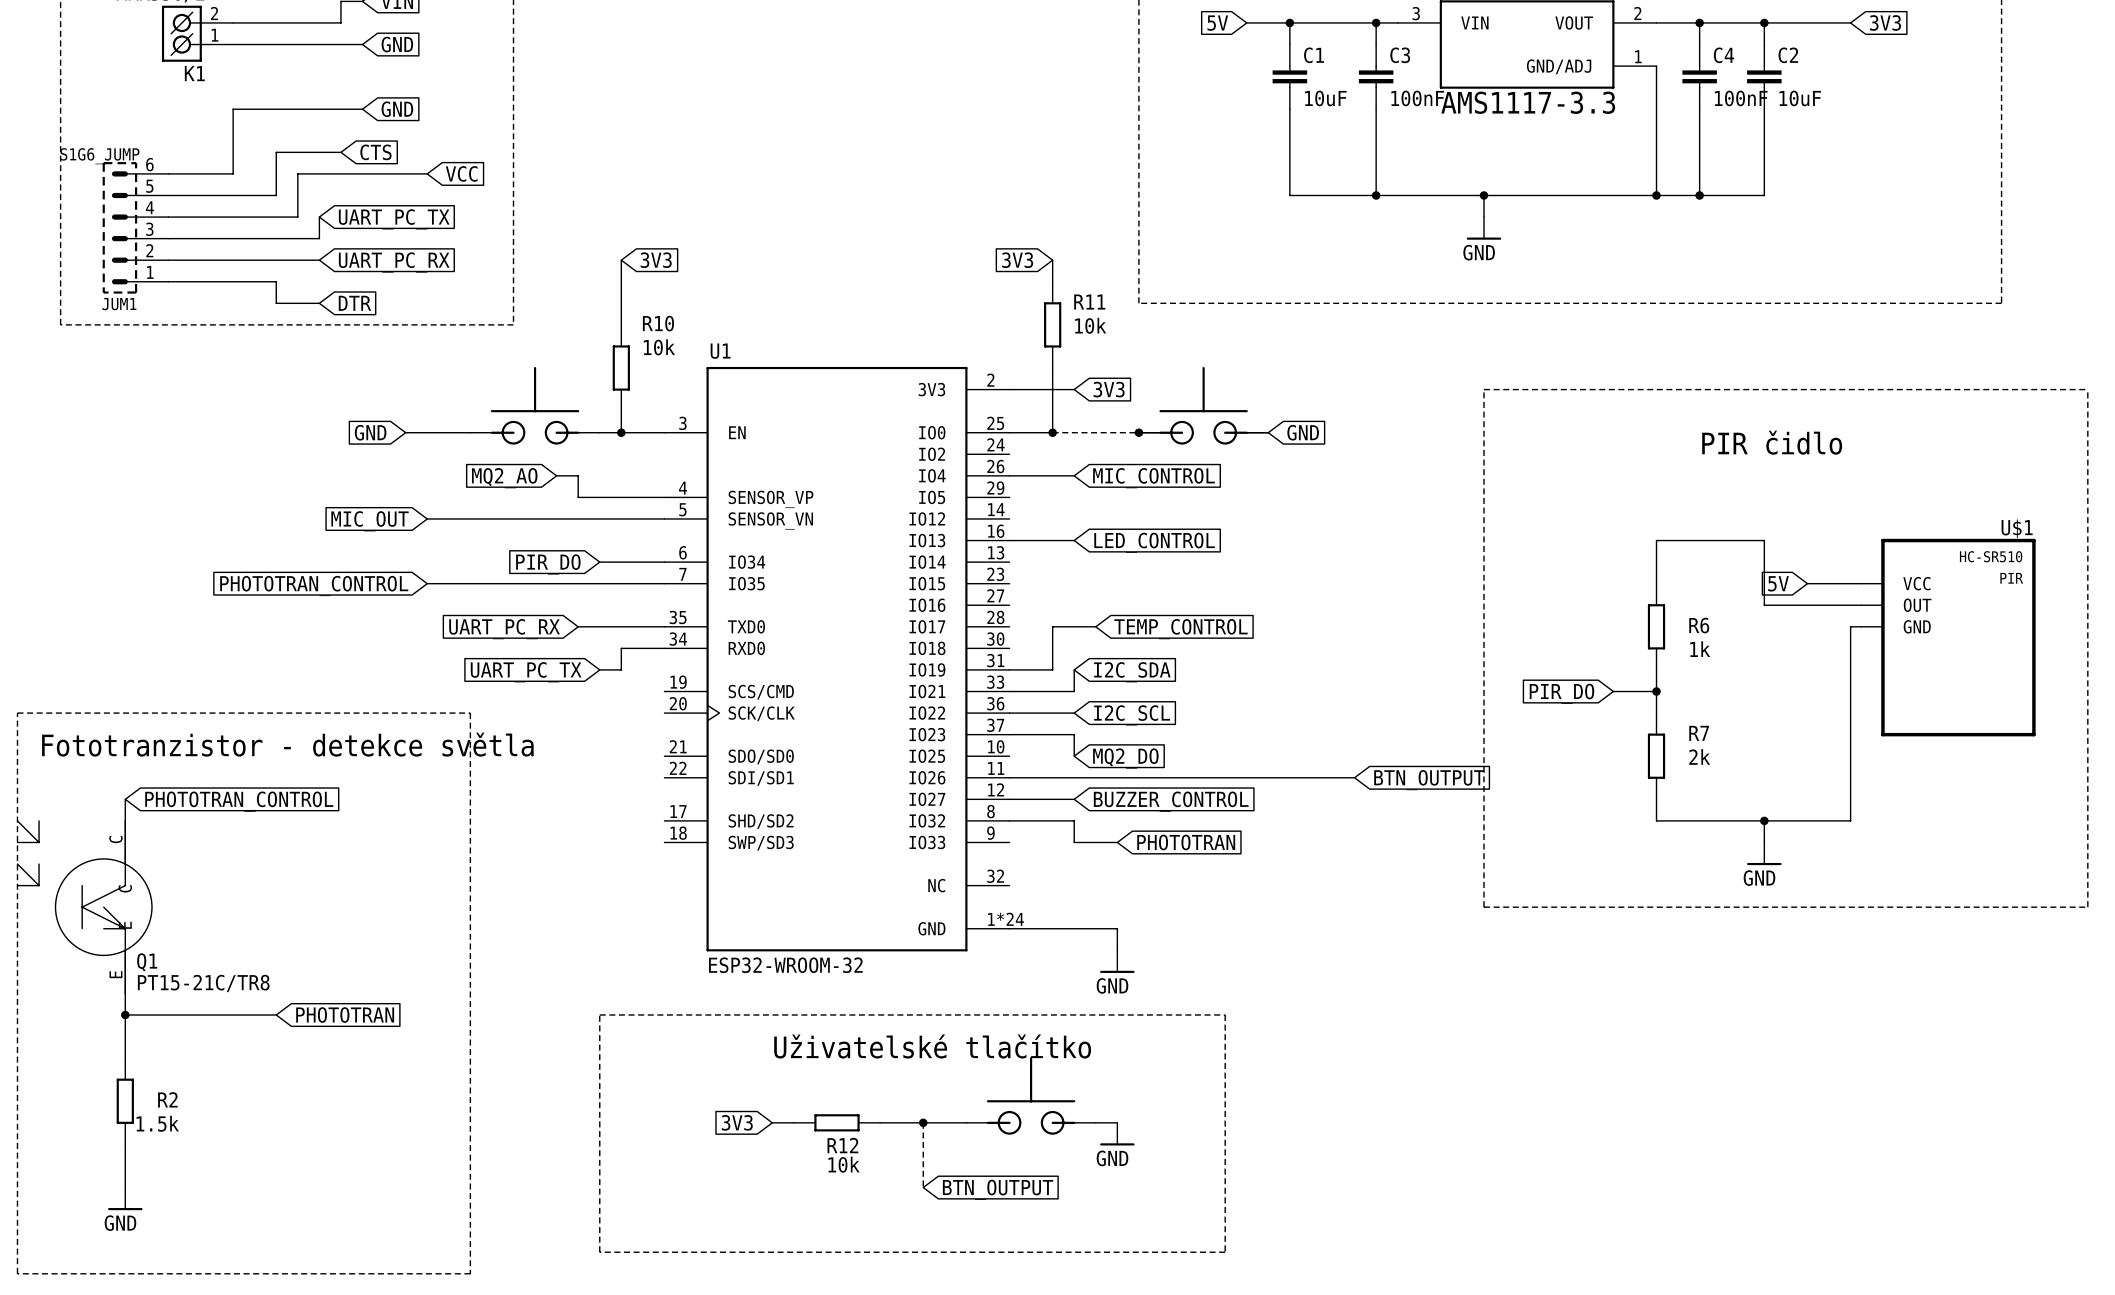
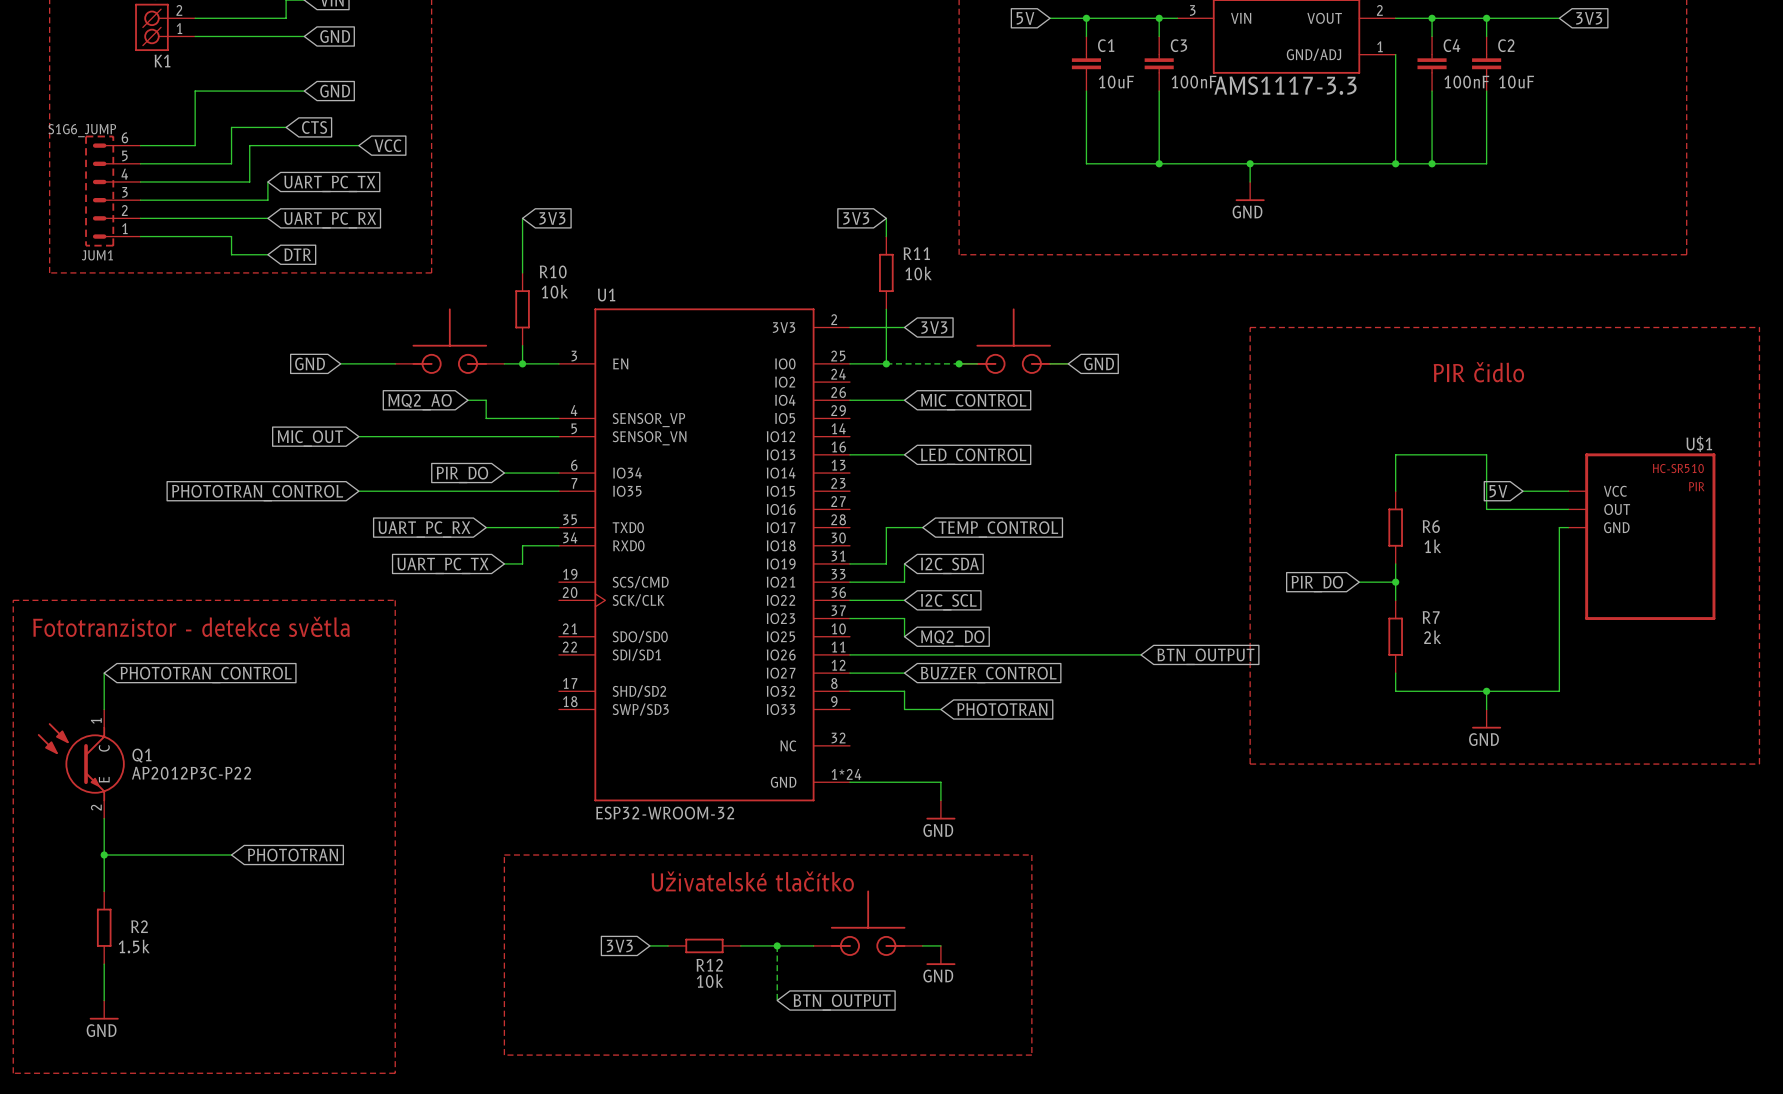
Q1 symbol: [16, 820, 153, 995] -> [37, 709, 125, 819]
Q1 name position: Q1 (147, 962) -> Q1 (141, 755)
Q1 value: PT15-21C/TR8 (203, 983) -> AP2012P3C-P22 (191, 773)

